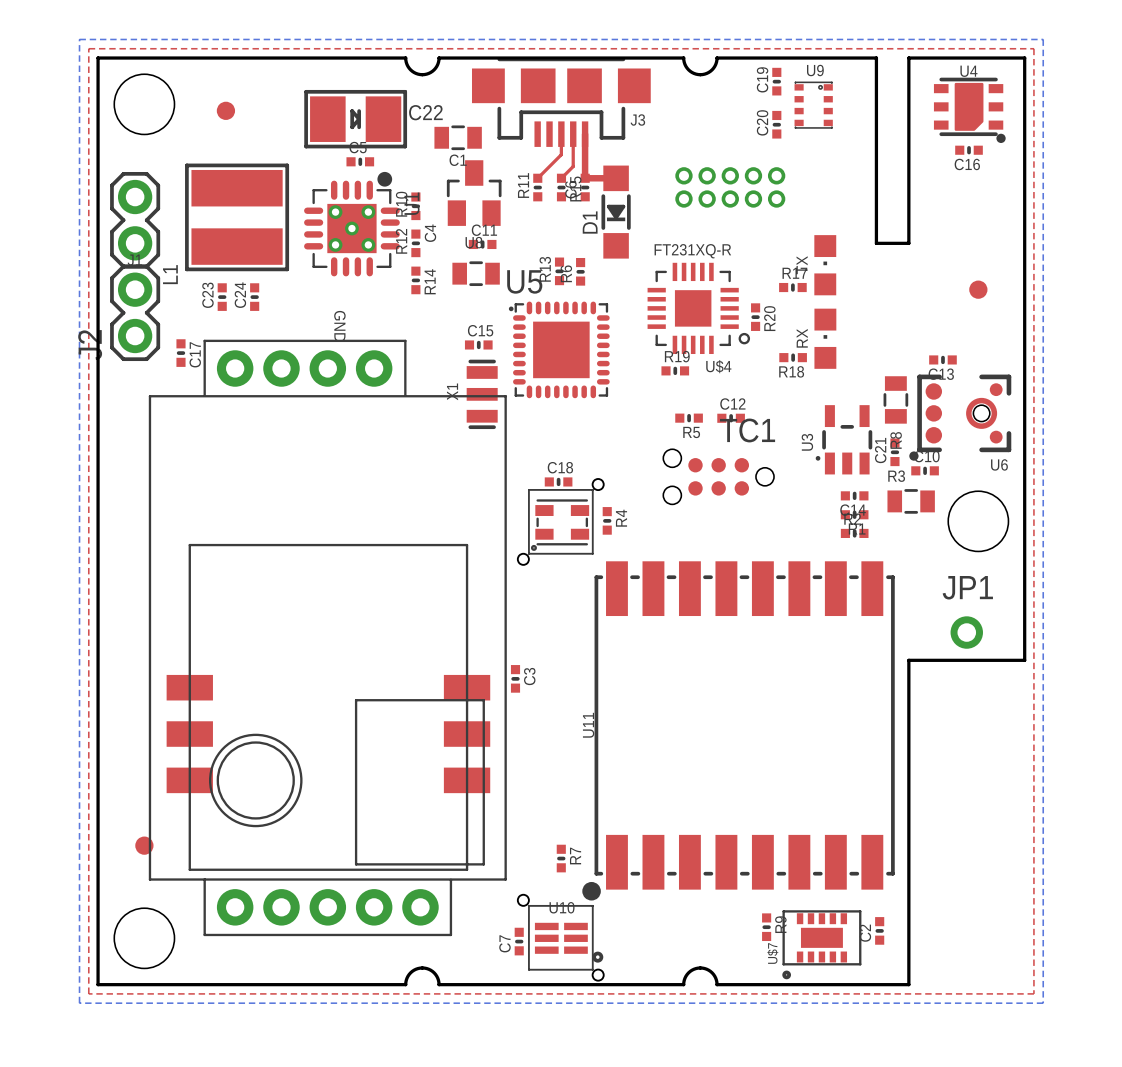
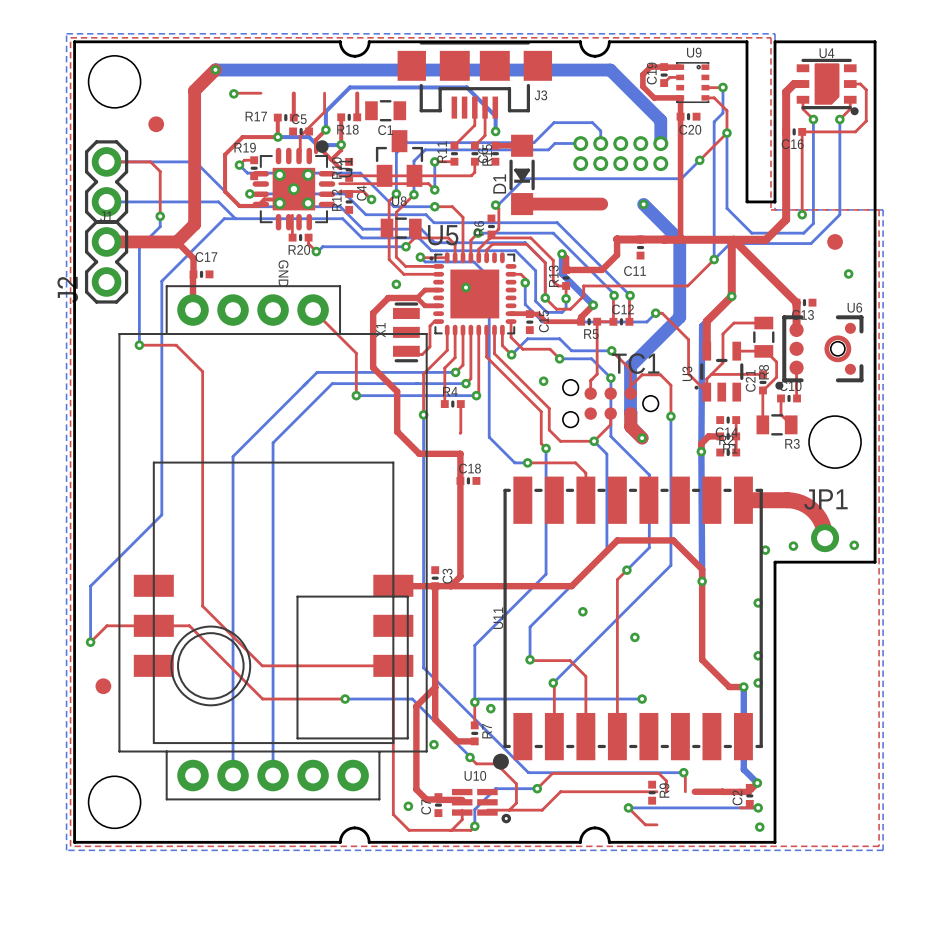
bottom zone outline: (79, 39) (1043, 39) (1043, 1003) (79, 1003) (79, 39) -> (66, 33) (66, 850) (883, 850) (883, 209) (775, 209) (775, 33) (66, 33)
top zone outline: (88, 48) (1033, 48) (1033, 993) (88, 993) (88, 48) -> (70, 37) (70, 846) (879, 846) (879, 209) (771, 209) (771, 37) (70, 37)
C19 position: (776, 81) -> (664, 75)
top track: none -> (664, 67) (650, 67) (642, 74) (642, 86) (654, 97) (680, 98) (680, 237) (678, 239)
top track: none -> (664, 67) (680, 67)
top track: none -> (215, 69) (194, 90) (194, 224) (177, 241)
bottom track: none -> (215, 70) (610, 70) (660, 120) (660, 143)
via: none -> (215, 69)
top track: none -> (680, 77) (669, 77) (664, 83)
top track: none -> (802, 84) (794, 84) (786, 91) (786, 219) (765, 239) (617, 239) (617, 255) (602, 269) (566, 269) (566, 258) (562, 254)
top track: none -> (850, 84) (860, 84) (866, 89) (866, 121) (855, 131) (802, 131) (802, 214)
part position: (225, 110) -> (156, 124)
bottom track: none -> (722, 87) (722, 113) (714, 121) (714, 259) (730, 243) (811, 243) (839, 214) (839, 119)
via: none -> (722, 87)
top track: none -> (705, 87) (722, 87)
top track: none -> (261, 93) (233, 93)
top track: none -> (294, 93) (293, 117)
top track: none -> (324, 93) (324, 112) (300, 136) (300, 152)
top track: none -> (357, 93) (357, 117)
via: none -> (233, 93)
C22: (355, 119) -> none
top track: none -> (705, 97) (714, 97) (726, 110) (726, 133) (699, 160)
C20 rotation: 0° (776, 124) -> 90° clockwise (688, 116)
C20 position: (776, 124) -> (688, 116)
top track: none -> (802, 99) (802, 109) (813, 119)
top track: none -> (850, 99) (850, 109) (839, 119)
top track: (585, 134) (585, 178) -> none
top track: none -> (277, 117) (277, 136)
top track: none -> (341, 117) (341, 150) (331, 159)
bottom track: none -> (813, 119) (813, 223) (803, 233) (751, 233) (726, 208) (726, 133)
via: none -> (813, 119)
via: none -> (839, 119)
C16 position: (969, 150) -> (794, 131)
top track: none -> (325, 129) (316, 139) (316, 152)
bottom track: none -> (325, 129) (325, 111) (349, 87) (466, 87) (495, 116) (495, 131)
via: none -> (325, 129)
via: none -> (495, 131)
via: none -> (726, 133)
top track: none -> (277, 137) (242, 137) (225, 154) (225, 191) (239, 205) (257, 205) (264, 199) (276, 199)
bottom track: none -> (277, 137) (309, 137) (317, 145) (341, 144)
via: none -> (277, 137)
bottom track: none -> (580, 143) (554, 143) (548, 149) (425, 149) (413, 161) (413, 194)
bottom track: none -> (600, 143) (600, 130) (592, 122) (554, 122) (534, 142) (406, 142) (396, 153) (396, 193)
via: none -> (341, 144)
top track: none -> (323, 152) (339, 167)
top track: none -> (254, 160) (244, 160) (239, 165)
bottom track: none -> (699, 160) (681, 178) (524, 178) (498, 205) (495, 205)
via: none -> (699, 160)
top track: none -> (434, 161) (454, 161)
top track: none -> (474, 161) (474, 172) (471, 175) (339, 175)
top track: none -> (106, 161) (150, 161) (160, 171) (160, 216)
bottom track: none -> (106, 161) (195, 161) (240, 206) (340, 206) (362, 229) (421, 229) (434, 242) (525, 242) (545, 262) (545, 297)
bottom track: none -> (434, 161) (434, 189)
via: none -> (434, 161)
bottom track: none -> (239, 165) (247, 173) (360, 173) (393, 206) (434, 206)
via: none -> (239, 165)
L1: (237, 217) -> none
top track: none -> (339, 183) (428, 183) (434, 189)
via: none -> (434, 189)
top track: none -> (339, 191) (363, 191) (371, 199)
bottom track: none -> (249, 193) (345, 193) (365, 214) (425, 214) (433, 222) (557, 222) (630, 295)
via: none -> (249, 193)
top track: none -> (396, 193) (389, 201) (389, 259) (403, 274) (438, 274)
via: none -> (396, 193)
top track: none -> (413, 194) (396, 212) (396, 257) (405, 266) (438, 266)
via: none -> (413, 194)
via: none -> (371, 199)
bottom track: none -> (106, 201) (218, 201) (235, 218)
C11 rotation: 0° (482, 244) -> 90° clockwise (640, 247)
C11 position: (482, 244) -> (640, 247)
top track: none -> (522, 204) (601, 204)
bottom track: none -> (643, 204) (679, 240) (679, 317) (630, 366) (630, 426) (642, 438)
via: none -> (643, 204)
top track: none -> (495, 205) (498, 208) (498, 229) (478, 249) (478, 257)
via: none -> (495, 205)
top track: none -> (434, 206) (452, 206) (463, 217) (463, 257)
via: none -> (434, 206)
top track: none -> (292, 215) (292, 237)
via: none -> (802, 214)
bottom track: none -> (160, 216) (160, 226) (139, 247) (139, 345)
via: none -> (160, 216)
TX: (825, 265) -> none
R13 position: (559, 271) -> (566, 277)
R17 name position: R17 (794, 273) -> R17 (256, 116)
top track: none -> (478, 233) (470, 240) (470, 257)
bottom track: none -> (478, 233) (553, 233) (614, 295)
via: none -> (478, 233)
R14: (415, 280) -> none
top track: none -> (308, 237) (308, 243) (316, 251)
top track: none -> (490, 237) (530, 237) (553, 260) (553, 281) (558, 285) (566, 285) (566, 298)
R17 position: (792, 287) -> (285, 117)
top track: none -> (106, 241) (177, 241)
top track: none -> (177, 241) (193, 258) (193, 310)
top track: none -> (405, 246) (414, 237) (448, 237) (455, 244) (455, 257)
bottom track: none -> (405, 246) (322, 246) (316, 251)
via: none -> (405, 246)
C23: (222, 297) -> none
C24: (254, 297) -> none
via: none -> (316, 251)
bottom track: none -> (562, 254) (562, 273) (593, 305)
via: none -> (562, 254)
top track: none -> (420, 257) (447, 257)
bottom track: none -> (420, 257) (425, 261) (474, 261) (489, 277) (489, 437) (514, 462) (527, 462)
via: none -> (420, 257)
top track: none -> (486, 257) (486, 250) (492, 244) (526, 244) (545, 262) (545, 297) (556, 309) (570, 309) (583, 296) (583, 285) (687, 285) (714, 259)
U$4: FT231XQ-R (698, 308) -> none
via: none -> (714, 259)
R20 rotation: 0° (755, 317) -> 90° clockwise (300, 237)
R20 position: (755, 317) -> (300, 237)
via: none -> (848, 273)
top track: none -> (511, 274) (520, 274) (525, 278) (525, 282)
bottom track: none -> (525, 282) (525, 304) (542, 322) (646, 322) (655, 313)
via: none -> (525, 282)
via: none -> (396, 284)
RX: (825, 338) -> none
via: none -> (466, 287)
C15 rotation: 0° (478, 344) -> 90° clockwise (529, 322)
C15 position: (478, 344) -> (529, 322)
top track: none -> (438, 290) (425, 290) (417, 297)
top track: none -> (614, 295) (613, 321)
via: none -> (614, 295)
top track: none -> (630, 295) (629, 321)
via: none -> (630, 295)
bottom track: none -> (731, 296) (702, 326) (702, 581)
via: none -> (731, 296)
C17 rotation: 0° (180, 353) -> 90° clockwise (201, 274)
C17 position: (180, 353) -> (201, 274)
top track: none -> (417, 297) (388, 297) (373, 313) (373, 367) (397, 391) (397, 431) (419, 453) (460, 453)
top track: none -> (417, 297) (425, 305) (438, 305)
via: none -> (545, 297)
bottom track: none -> (566, 298) (566, 308) (562, 312) (546, 312) (535, 301) (535, 270) (515, 250) (431, 250) (418, 237) (361, 237) (342, 218) (224, 218) (161, 281) (161, 514) (90, 586) (90, 642)
via: none -> (566, 298)
R18 position: (793, 357) -> (349, 117)
top track: none -> (593, 305) (581, 317) (581, 321) (545, 321) (538, 314) (511, 313)
via: none -> (593, 305)
top track: none -> (313, 310) (356, 353) (356, 395)
R19 rotation: 0° (675, 370) -> 90° clockwise (254, 168)
R19 position: (675, 370) -> (254, 168)
top track: none -> (655, 313) (662, 313) (688, 339) (688, 373) (706, 392) (706, 378) (722, 362) (722, 334) (733, 323) (763, 323)
via: none -> (655, 313)
top track: none -> (438, 321) (434, 321) (429, 326) (429, 346) (422, 354) (403, 354)
top track: none -> (511, 321) (511, 337) (522, 349) (550, 349) (559, 358)
top track: none -> (613, 321) (597, 321) (597, 374) (590, 380) (590, 393)
top track: none -> (447, 330) (447, 350) (423, 374) (423, 414)
top track: none -> (455, 330) (455, 357) (444, 368) (444, 404)
top track: none -> (463, 330) (463, 365) (455, 372)
top track: none -> (470, 330) (470, 378) (466, 383)
top track: none -> (478, 330) (478, 393) (476, 395)
top track: none -> (486, 330) (486, 357) (541, 411) (541, 443) (546, 448)
top track: none -> (494, 330) (494, 353) (549, 408) (549, 430) (560, 441) (594, 441) (610, 424) (610, 413)
top track: none -> (502, 330) (502, 345) (511, 354)
top track: none -> (796, 329) (796, 302) (733, 239) (731, 241) (731, 296) (706, 321) (706, 351)
top track: none -> (139, 345) (176, 345) (202, 371) (202, 606) (262, 665) (393, 665) (393, 814) (409, 830) (470, 830) (474, 826)
via: none -> (139, 345)
top track: none -> (611, 350) (630, 369) (630, 393)
bottom track: none -> (611, 350) (571, 350) (559, 338) (527, 338) (511, 354)
via: none -> (611, 350)
top track: none -> (736, 351) (765, 351) (776, 362) (776, 377) (762, 391) (762, 424)
R5 position: (689, 418) -> (589, 321)
C12 position: (731, 418) -> (621, 321)
via: none -> (511, 354)
bottom track: none -> (559, 358) (591, 358) (610, 378) (610, 436) (649, 474) (649, 547) (626, 570)
via: none -> (559, 358)
top track: none -> (796, 367) (797, 398)
bottom track: none -> (455, 372) (317, 372) (233, 456) (233, 775)
via: none -> (455, 372)
top track: none -> (711, 374) (763, 374)
via: none -> (610, 378)
via: none -> (543, 381)
bottom track: none -> (466, 383) (332, 383) (273, 442) (273, 775)
via: none -> (466, 383)
top track: none -> (630, 386) (642, 374) (660, 374) (670, 385) (670, 416)
U6 name position: U6 (999, 464) -> U6 (854, 307)
bottom track: none -> (356, 395) (476, 395)
via: none -> (356, 395)
via: none -> (476, 395)
top track: none -> (781, 398) (781, 414) (791, 424)
R3 name position: R3 (896, 476) -> R3 (792, 443)
top track: none -> (460, 404) (460, 433)
drawing: [516, 478, 605, 566] -> none
C18 position: (558, 481) -> (468, 480)
top track: none -> (630, 413) (630, 426) (642, 438)
bottom track: none -> (423, 414) (423, 667) (528, 772) (683, 772)
via: none -> (423, 414)
bottom track: none -> (670, 416) (670, 565) (553, 683)
via: none -> (670, 416)
top track: none -> (736, 420) (736, 452)
top track: none -> (720, 436) (708, 436) (701, 443) (701, 451)
via: none -> (642, 438)
R4 rotation: 0° (607, 520) -> 90° clockwise (452, 404)
R4 position: (607, 520) -> (452, 404)
bottom track: none -> (594, 441) (606, 454) (606, 550) (530, 626) (530, 659)
via: none -> (594, 441)
part: (560, 525) -> none
bottom track: none -> (546, 448) (546, 574) (474, 645) (474, 702) (478, 699) (642, 699)
via: none -> (546, 448)
via: none -> (701, 451)
top track: none -> (460, 453) (460, 576) (450, 586)
via: none -> (527, 462)
top track: none -> (528, 463) (575, 462) (585, 473) (585, 500)
top track: none -> (743, 500) (787, 500) (801, 503) (817, 515) (822, 523) (825, 538)
via: none -> (854, 545)
via: none -> (793, 546)
via: none -> (765, 550)
top track: none -> (626, 570) (617, 579) (617, 736)
via: none -> (626, 570)
via: none -> (702, 581)
top track: none -> (393, 585) (571, 586) (617, 540) (673, 540) (702, 569) (702, 659) (729, 687) (743, 687)
top track: none -> (435, 586) (435, 719) (457, 741) (474, 741)
via: none -> (758, 602)
via: none -> (582, 611)
via: none -> (634, 637)
top track: none -> (90, 642) (106, 625) (189, 625) (262, 699) (345, 699)
via: none -> (90, 642)
via: none -> (758, 655)
top track: none -> (530, 659) (570, 660) (585, 676) (585, 736)
via: none -> (530, 659)
top track: none -> (553, 683) (554, 736)
via: none -> (553, 683)
via: none -> (758, 683)
bottom track: none -> (743, 687) (743, 769) (757, 783)
via: none -> (743, 687)
top track: none -> (435, 687) (416, 706) (416, 789) (426, 799) (462, 799)
bottom track: none -> (345, 699) (412, 699) (470, 757)
via: none -> (345, 699)
via: none -> (642, 699)
top track: none -> (474, 702) (474, 725)
via: none -> (474, 702)
via: none -> (490, 708)
part position: (144, 845) -> (103, 686)
via: none -> (433, 744)
top track: none -> (470, 757) (476, 763) (496, 763) (516, 783) (516, 803) (509, 810)
via: none -> (470, 757)
drawing: [516, 893, 605, 982] -> none
top track: none -> (683, 772) (685, 791)
via: none -> (683, 772)
top track: none -> (757, 783) (748, 791) (722, 791)
via: none -> (757, 783)
top track: none -> (537, 788) (552, 773) (658, 773) (666, 781) (666, 791)
bottom track: none -> (537, 788) (495, 788) (474, 809) (474, 826)
via: none -> (537, 788)
top track: none -> (657, 791) (560, 791) (542, 810) (487, 810)
top track: none -> (694, 791) (722, 791)
via: none -> (408, 806)
top track: none -> (628, 807) (645, 824) (657, 824)
bottom track: none -> (628, 807) (758, 807)
via: none -> (628, 807)
U$7: (821, 944) -> none
top track: none -> (740, 807) (758, 807)
via: none -> (758, 807)
top track: none -> (462, 810) (462, 819) (451, 830)
via: none -> (474, 826)
via: none -> (759, 827)

